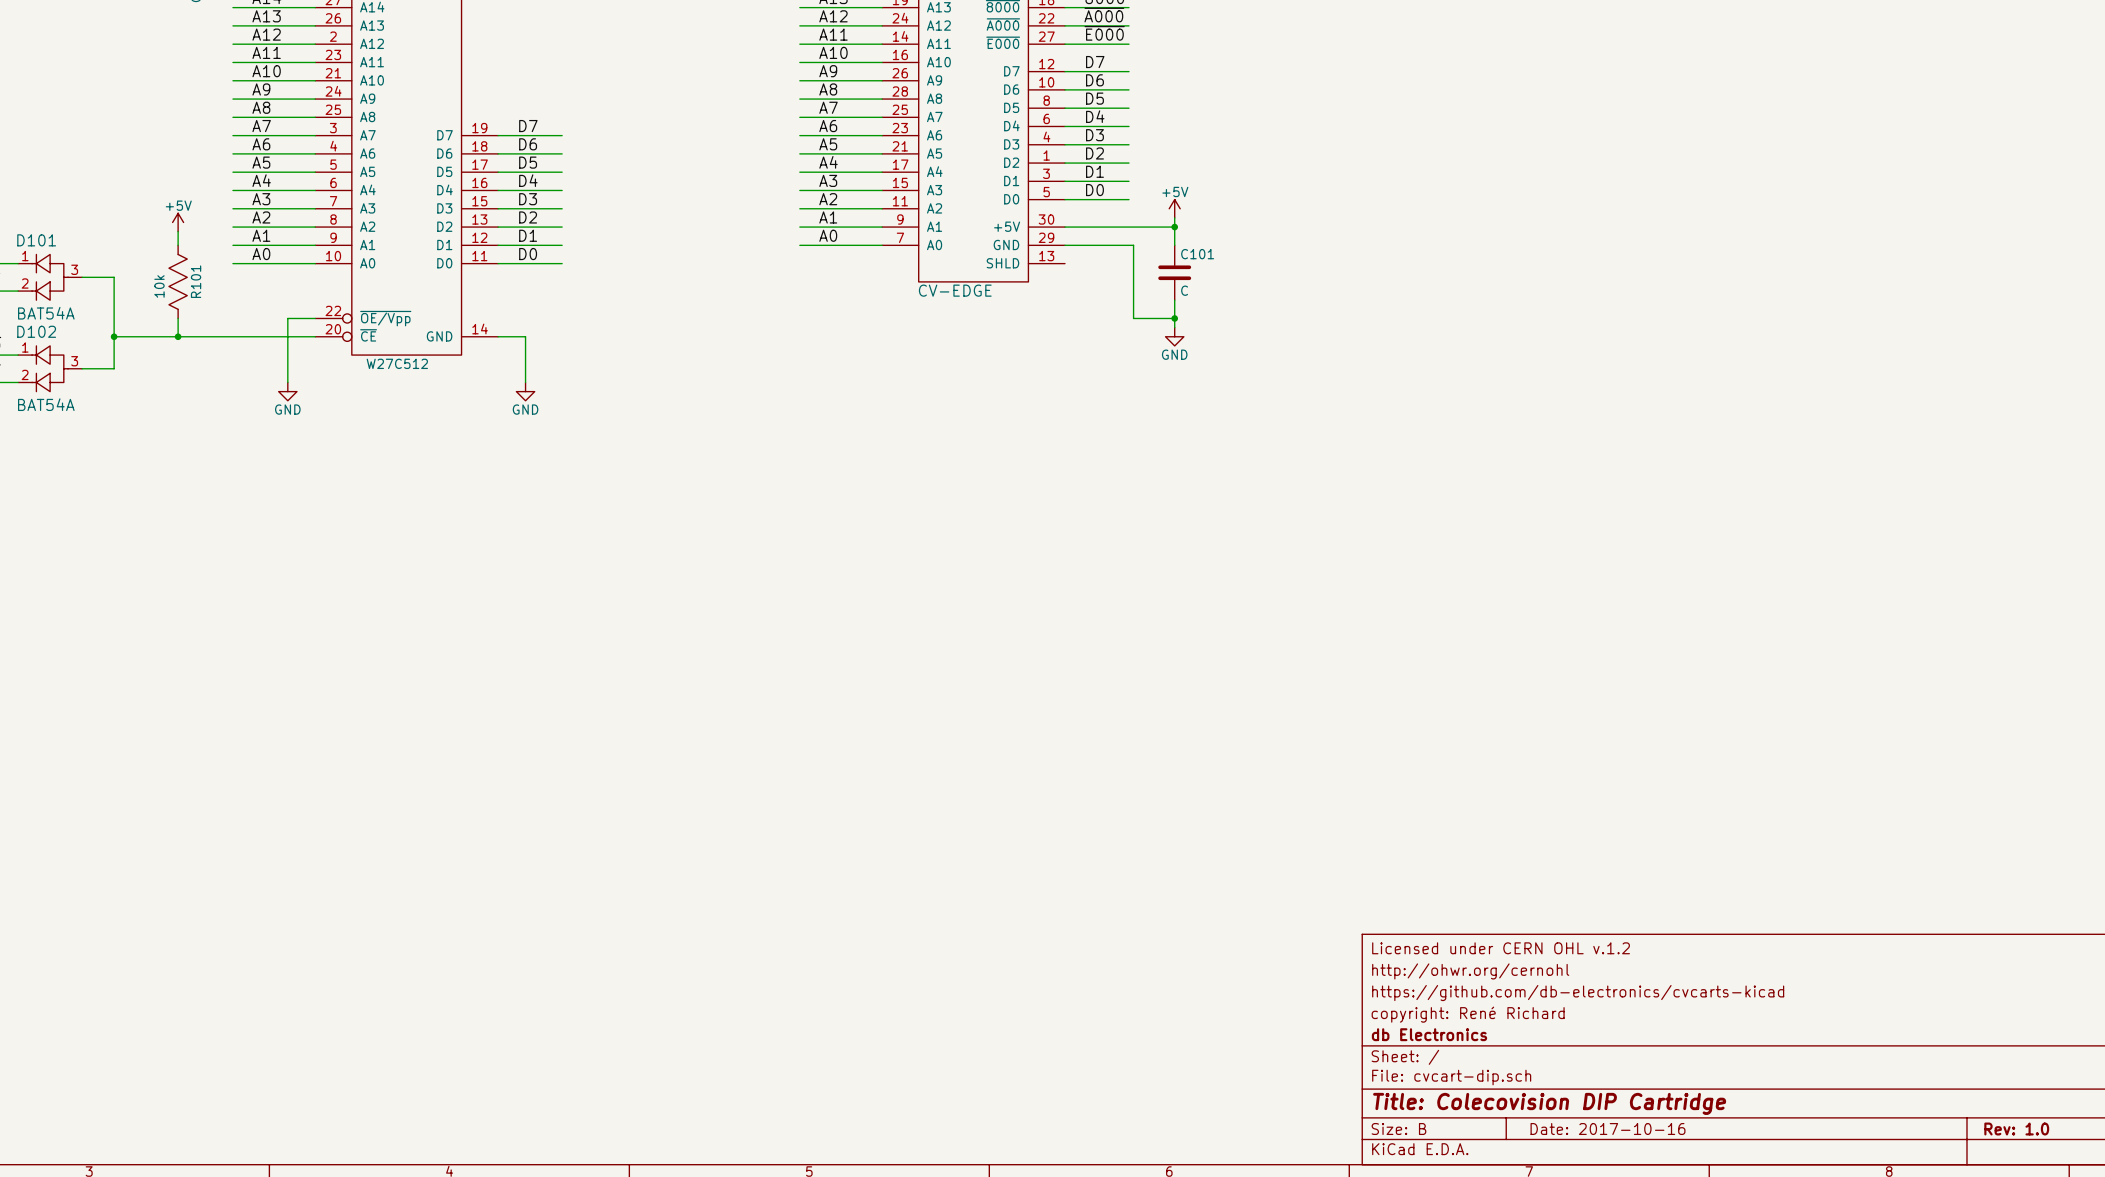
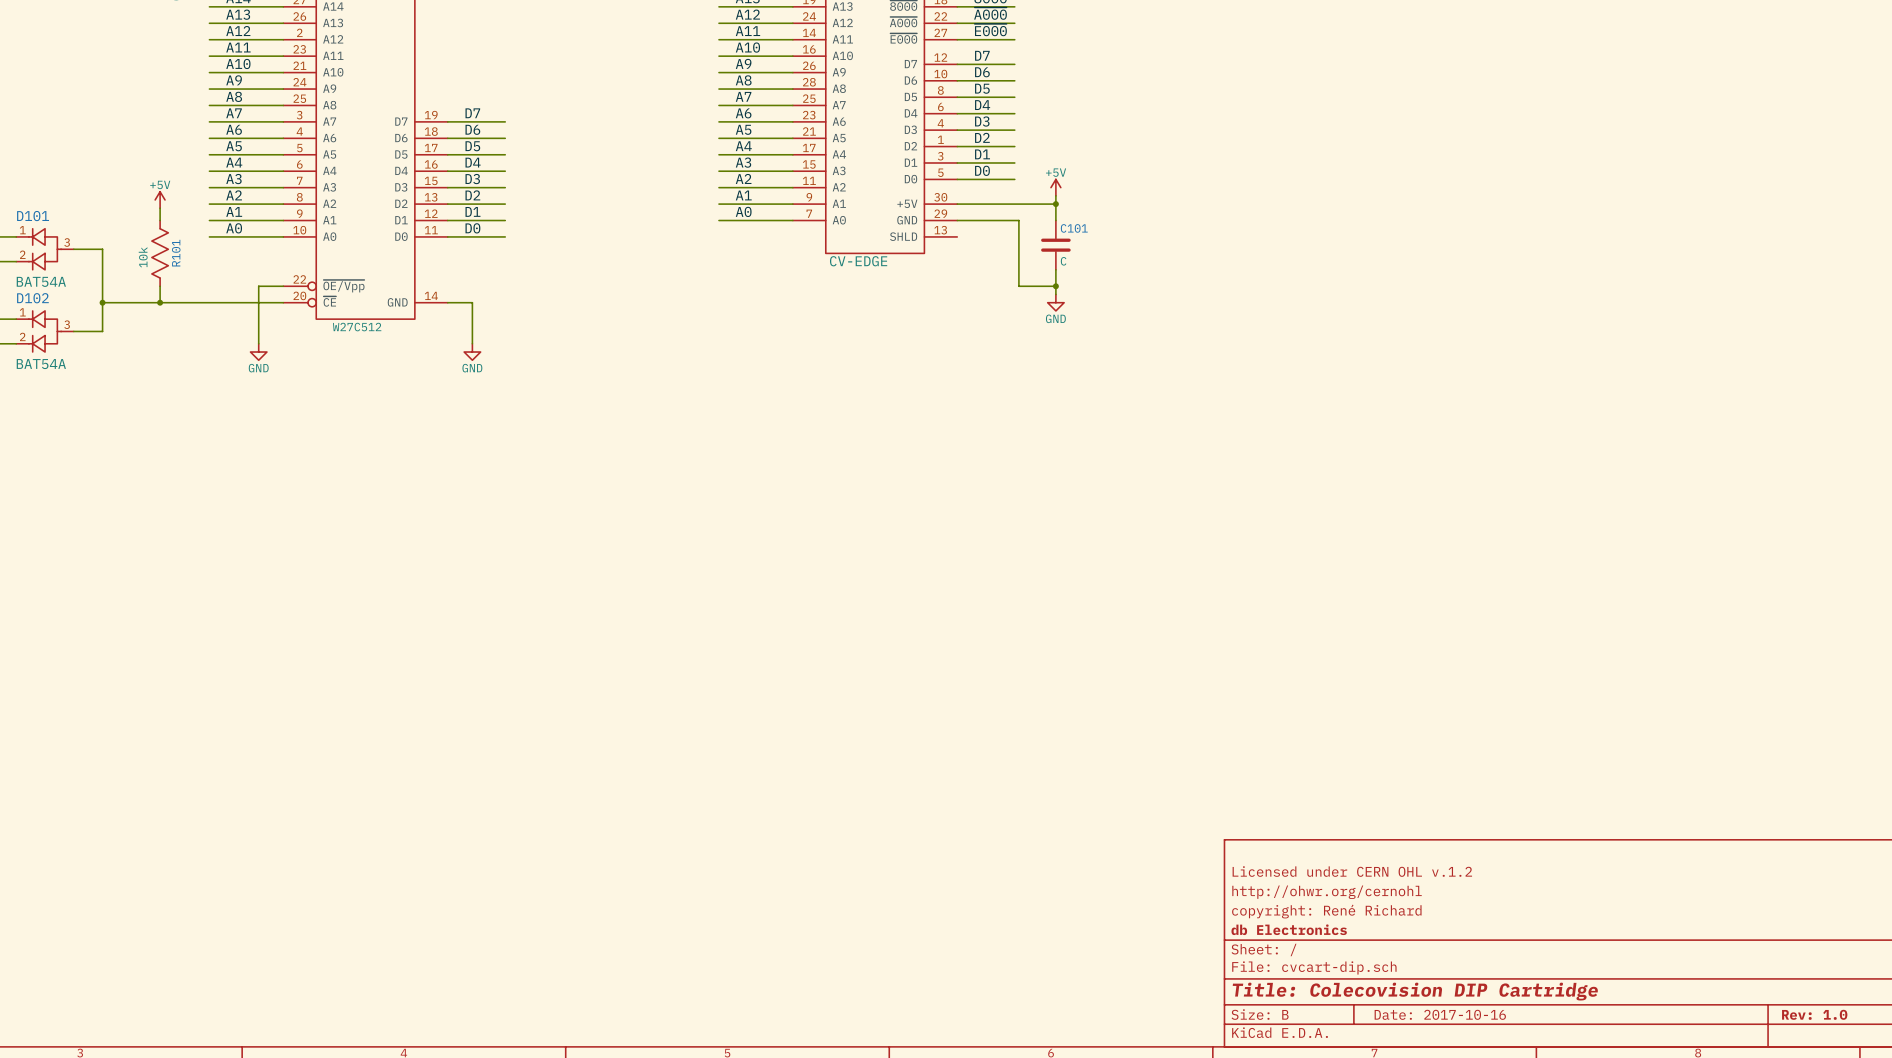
title block: Licensed under CERN OHL v.1.2 (1501, 948) -> none
title block: http://ohwr.org/cernohl (1470, 971) -> Licensed under CERN OHL v.1.2 (1352, 871)
title block: https://github.com/db-electronics/cvcarts-kicad (1578, 993) -> http://ohwr.org/cernohl (1327, 892)

